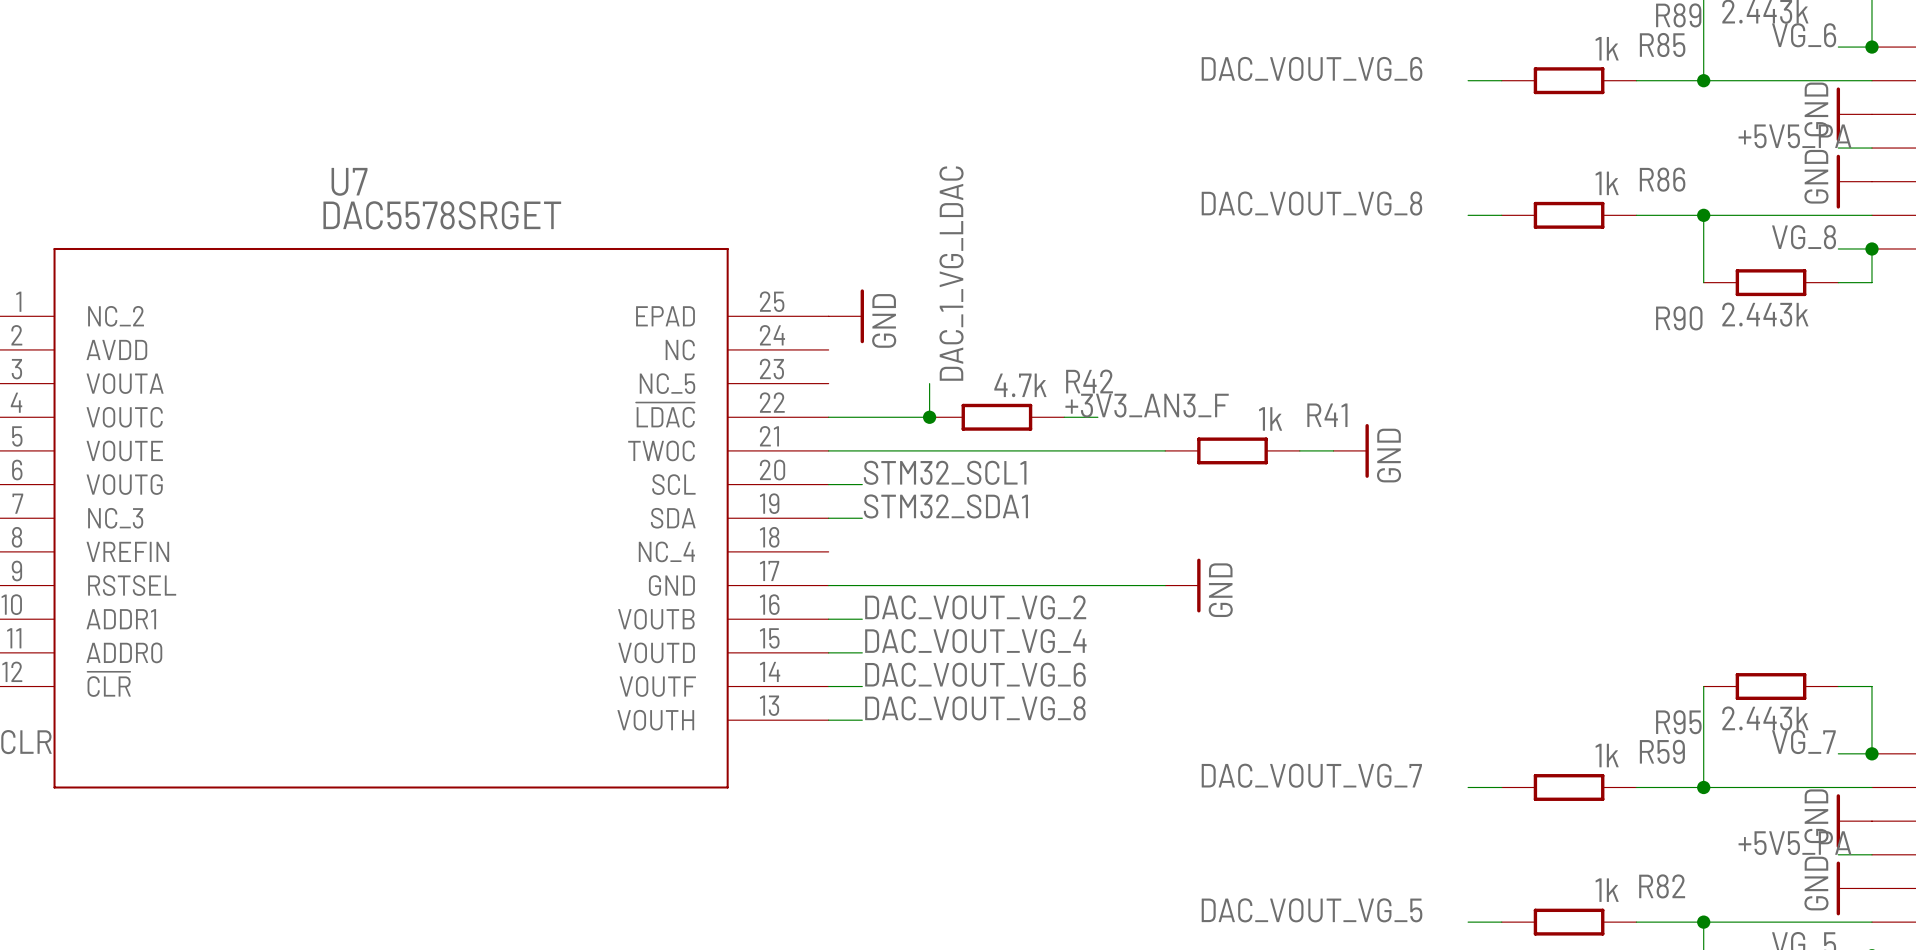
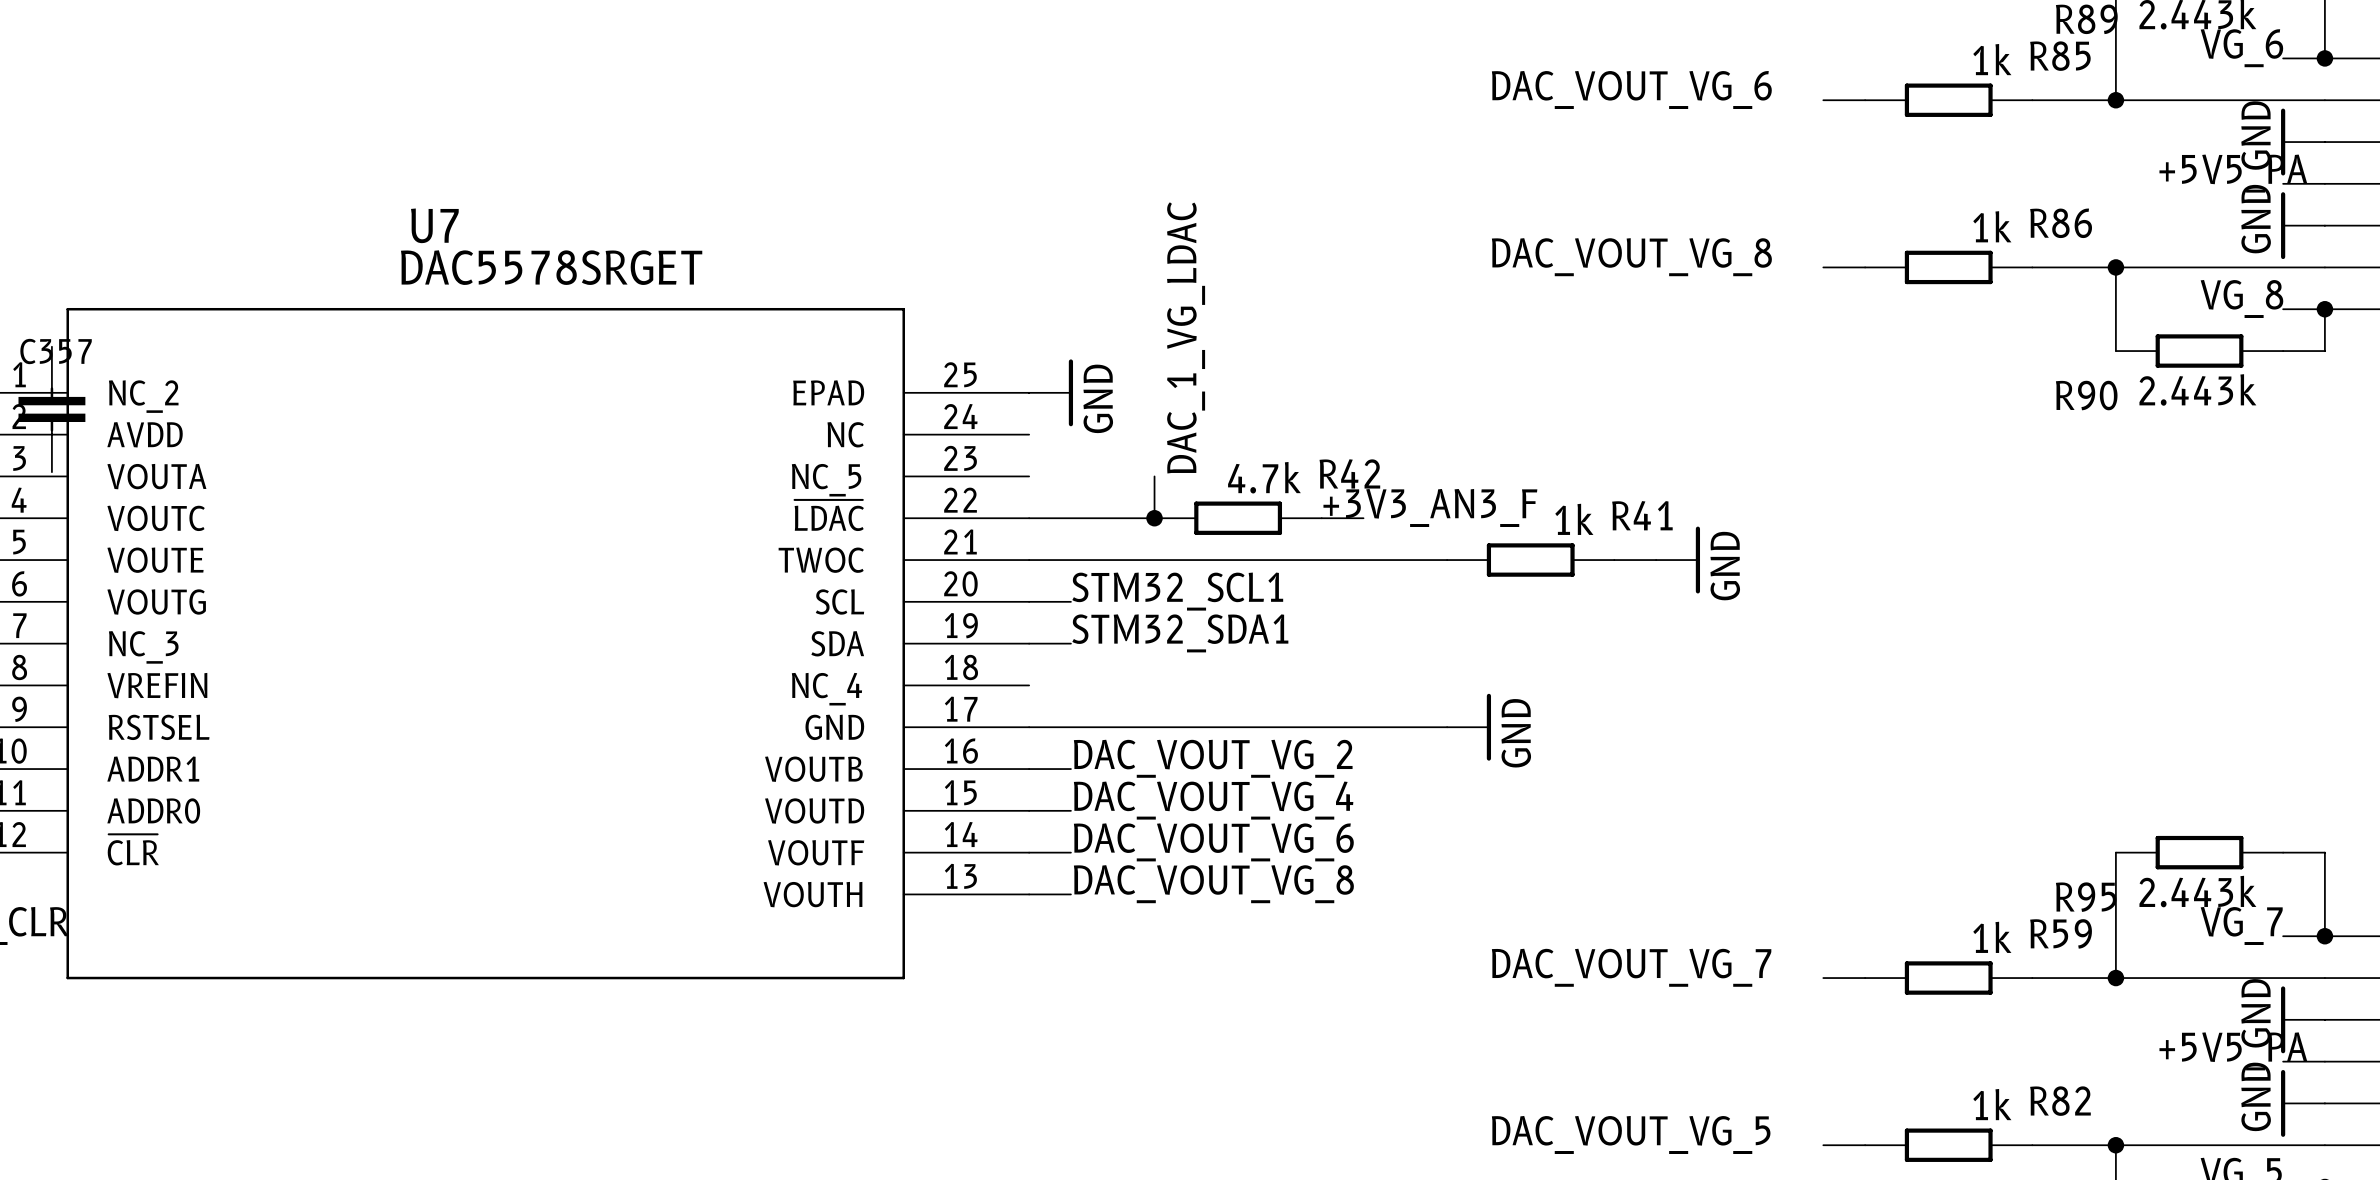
C357: none -> (51, 409)

